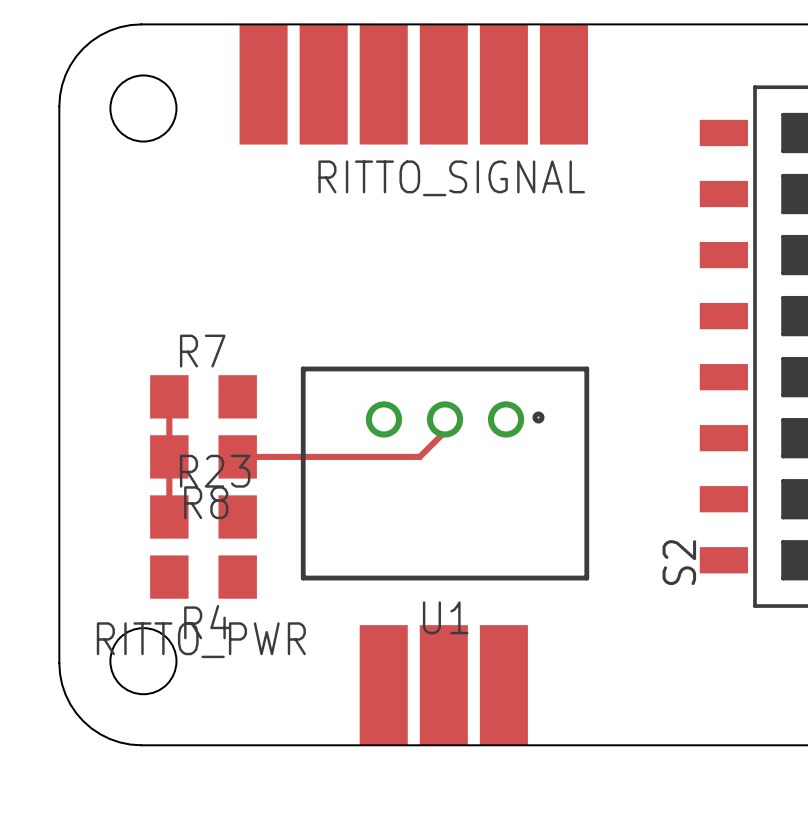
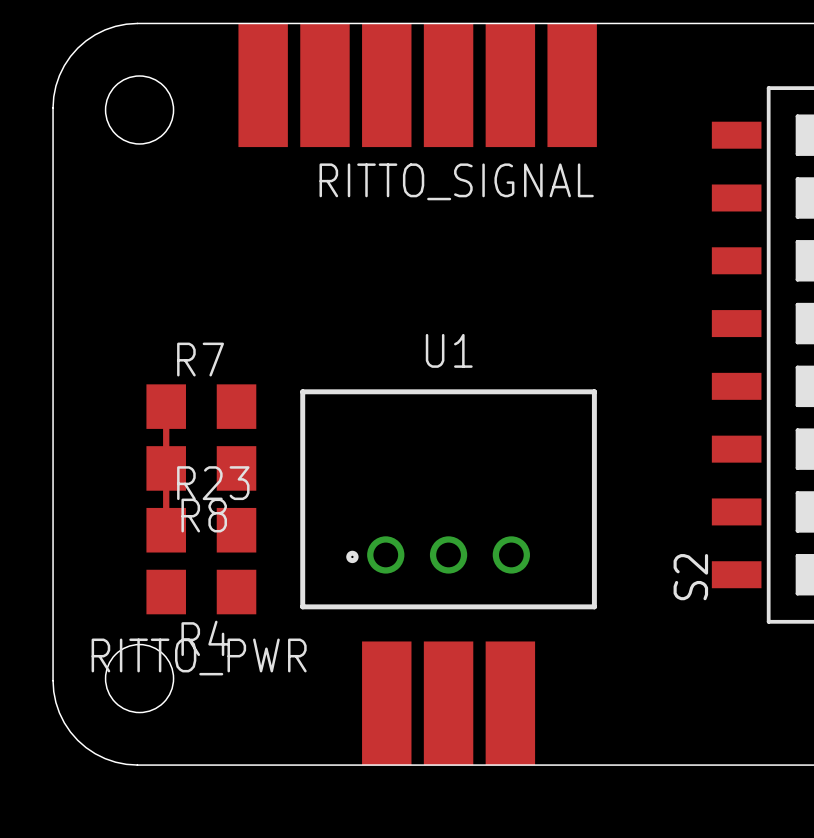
track: (445, 419) (445, 431) (419, 456) (237, 456) -> none
U1 rotation: 0° (445, 473) -> 180° (448, 499)

